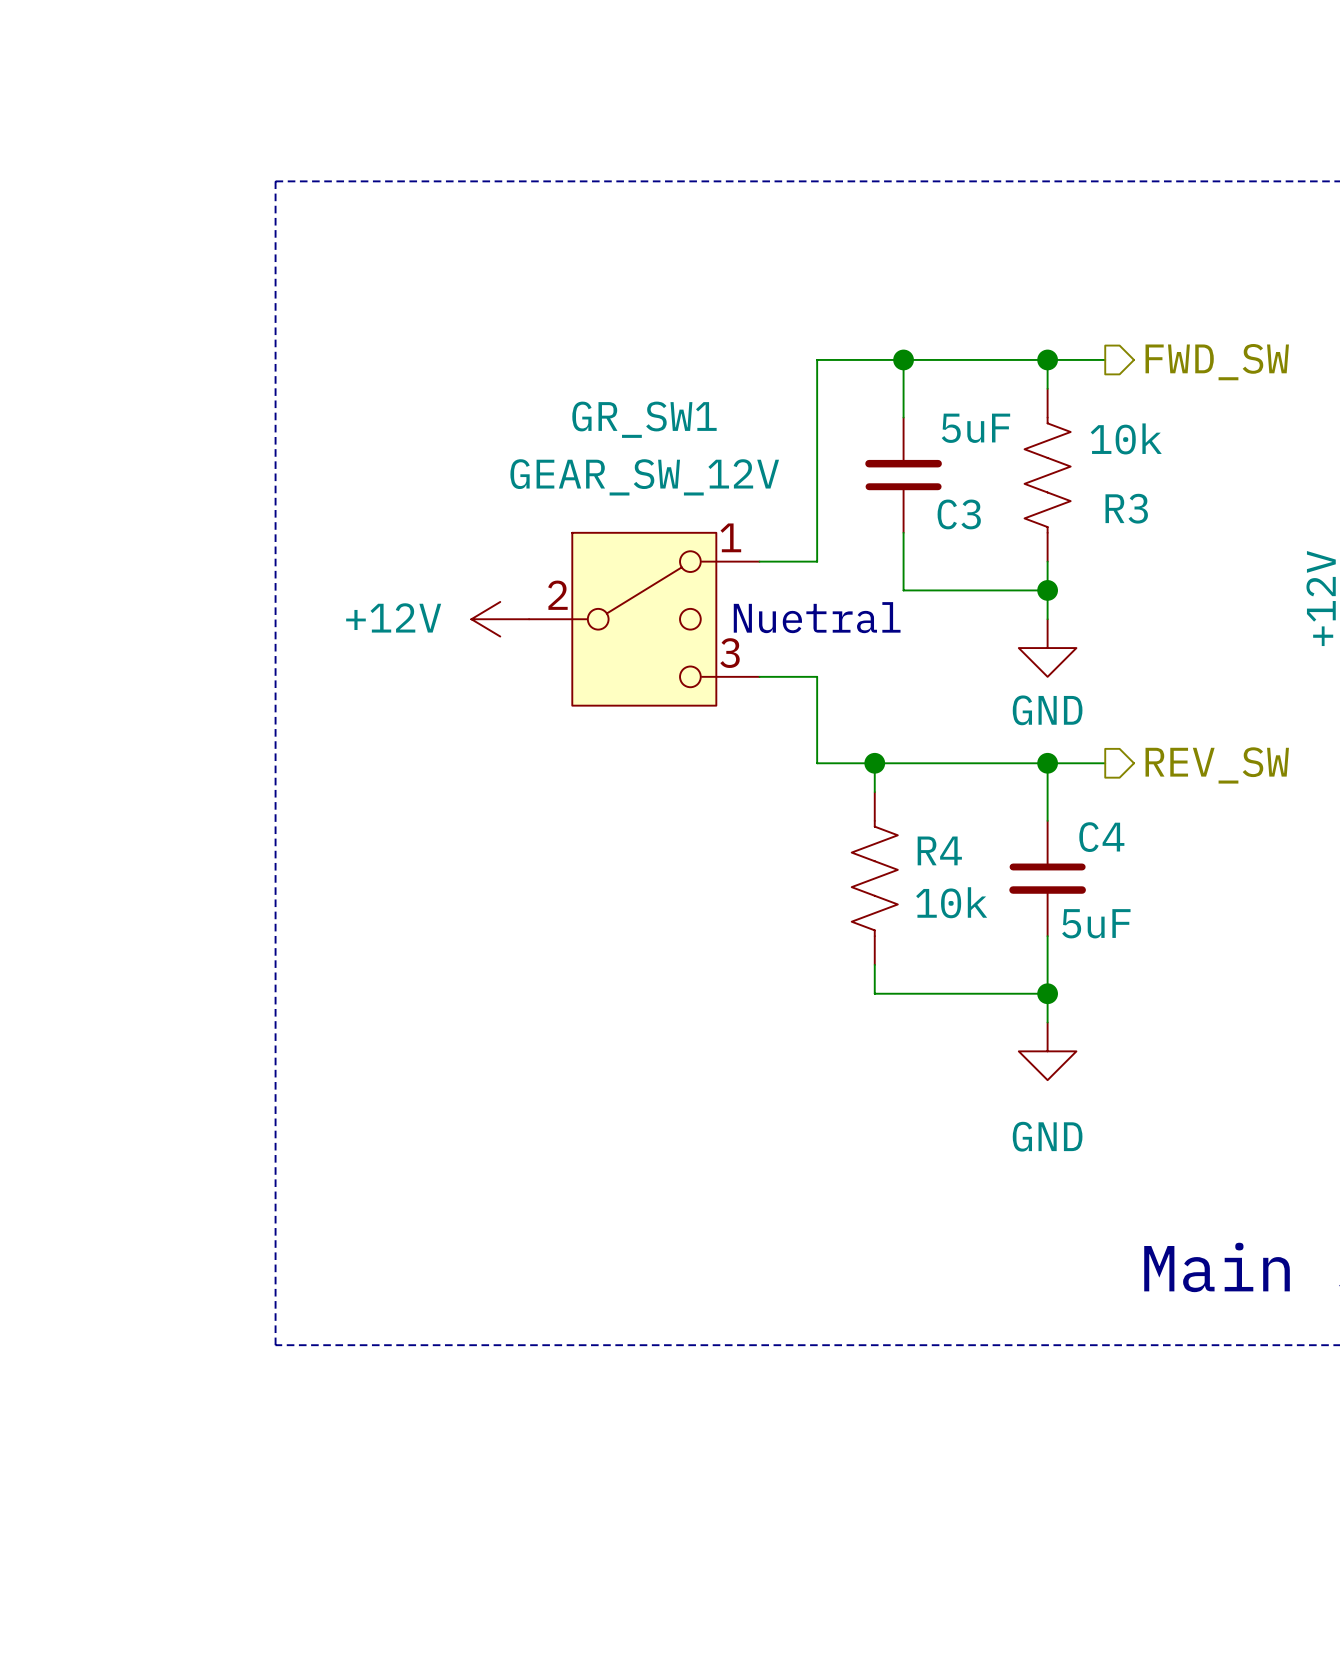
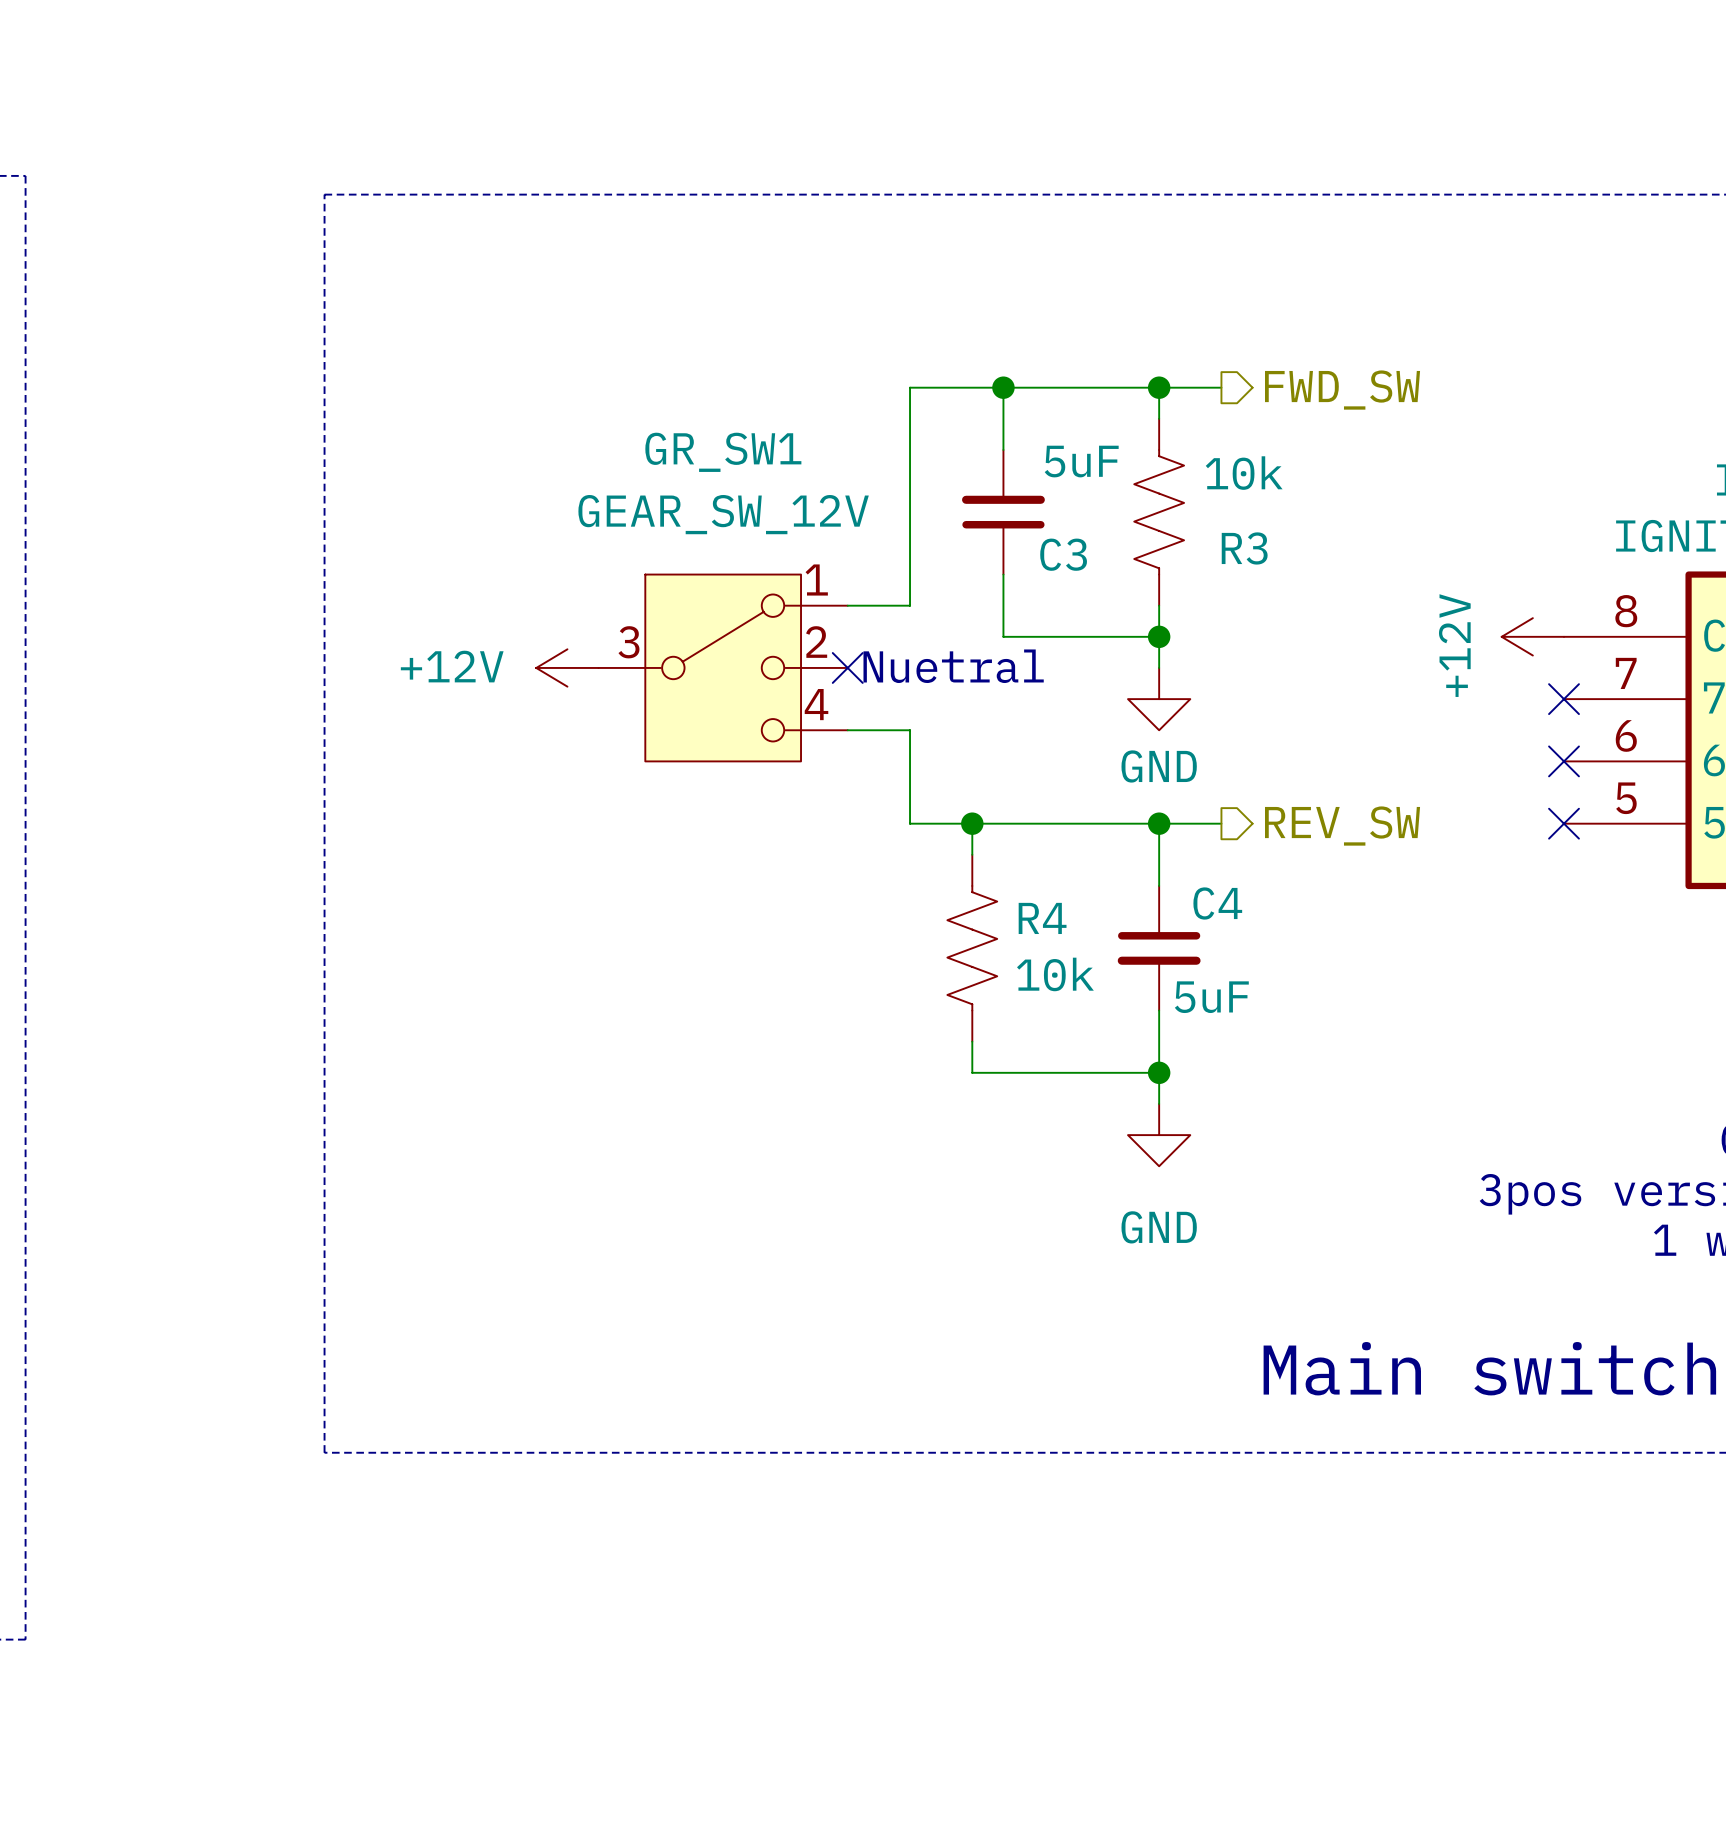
GR_SW1 symbol: [529, 532, 760, 706] -> [598, 574, 848, 762]
text position: Nuetral (817, 617) -> Nuetral (953, 666)
no-connect mark: none -> (847, 667)

